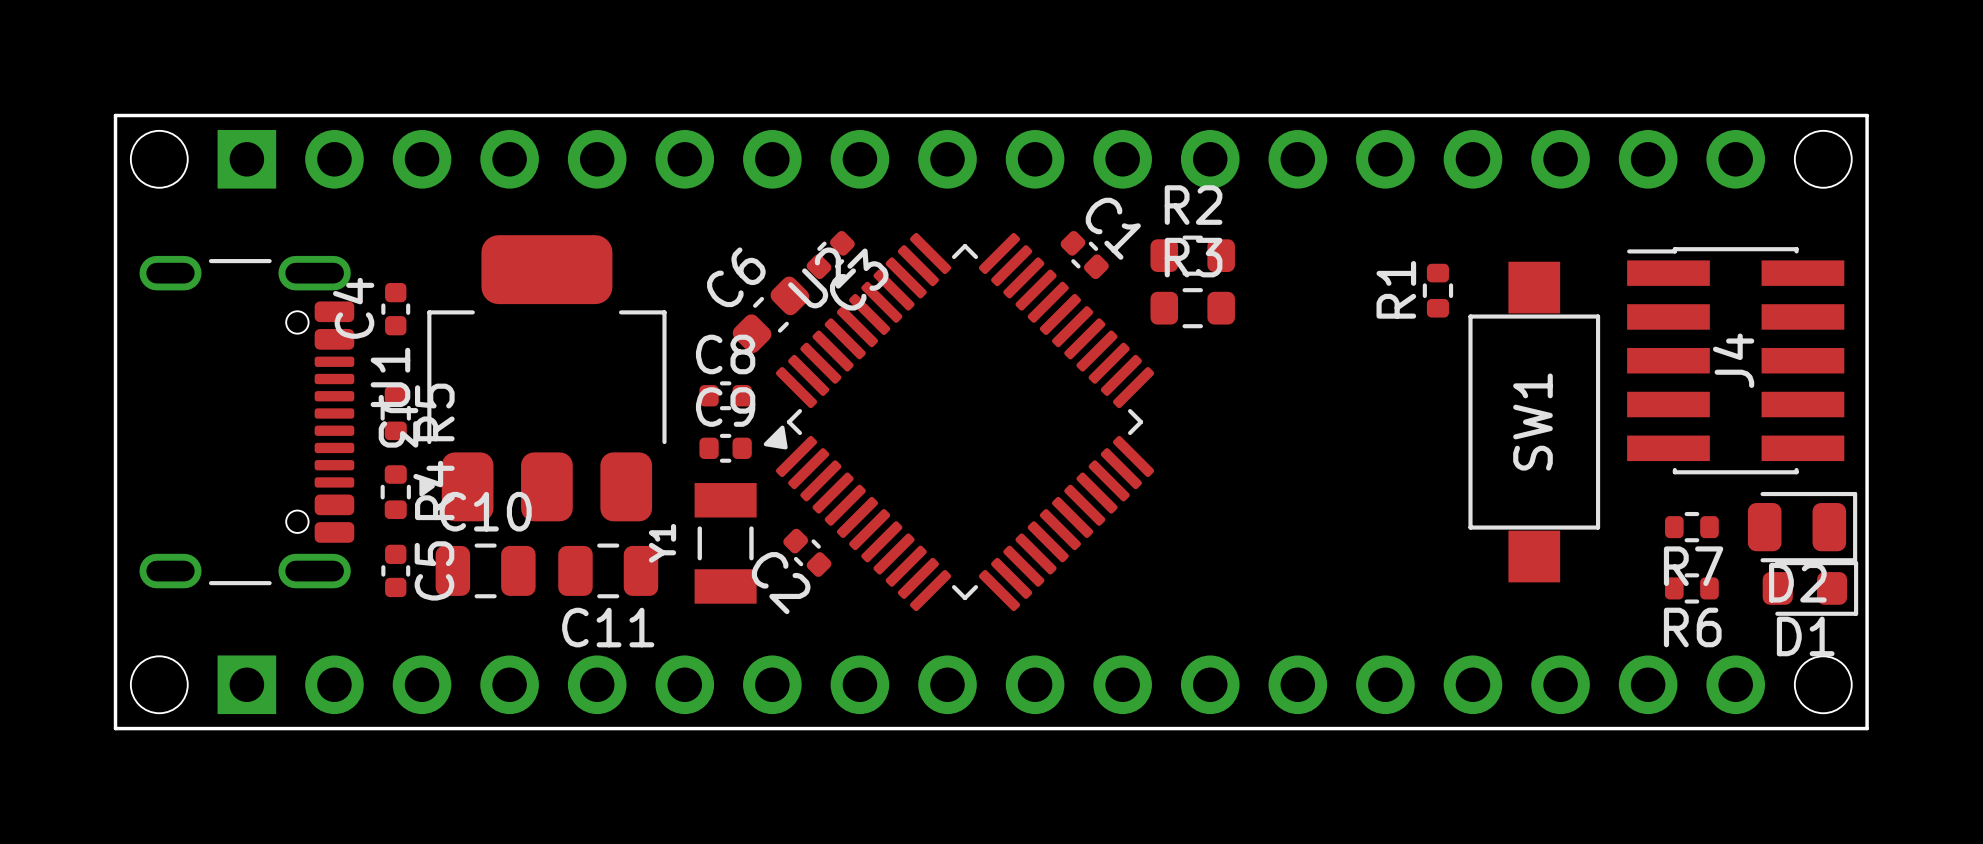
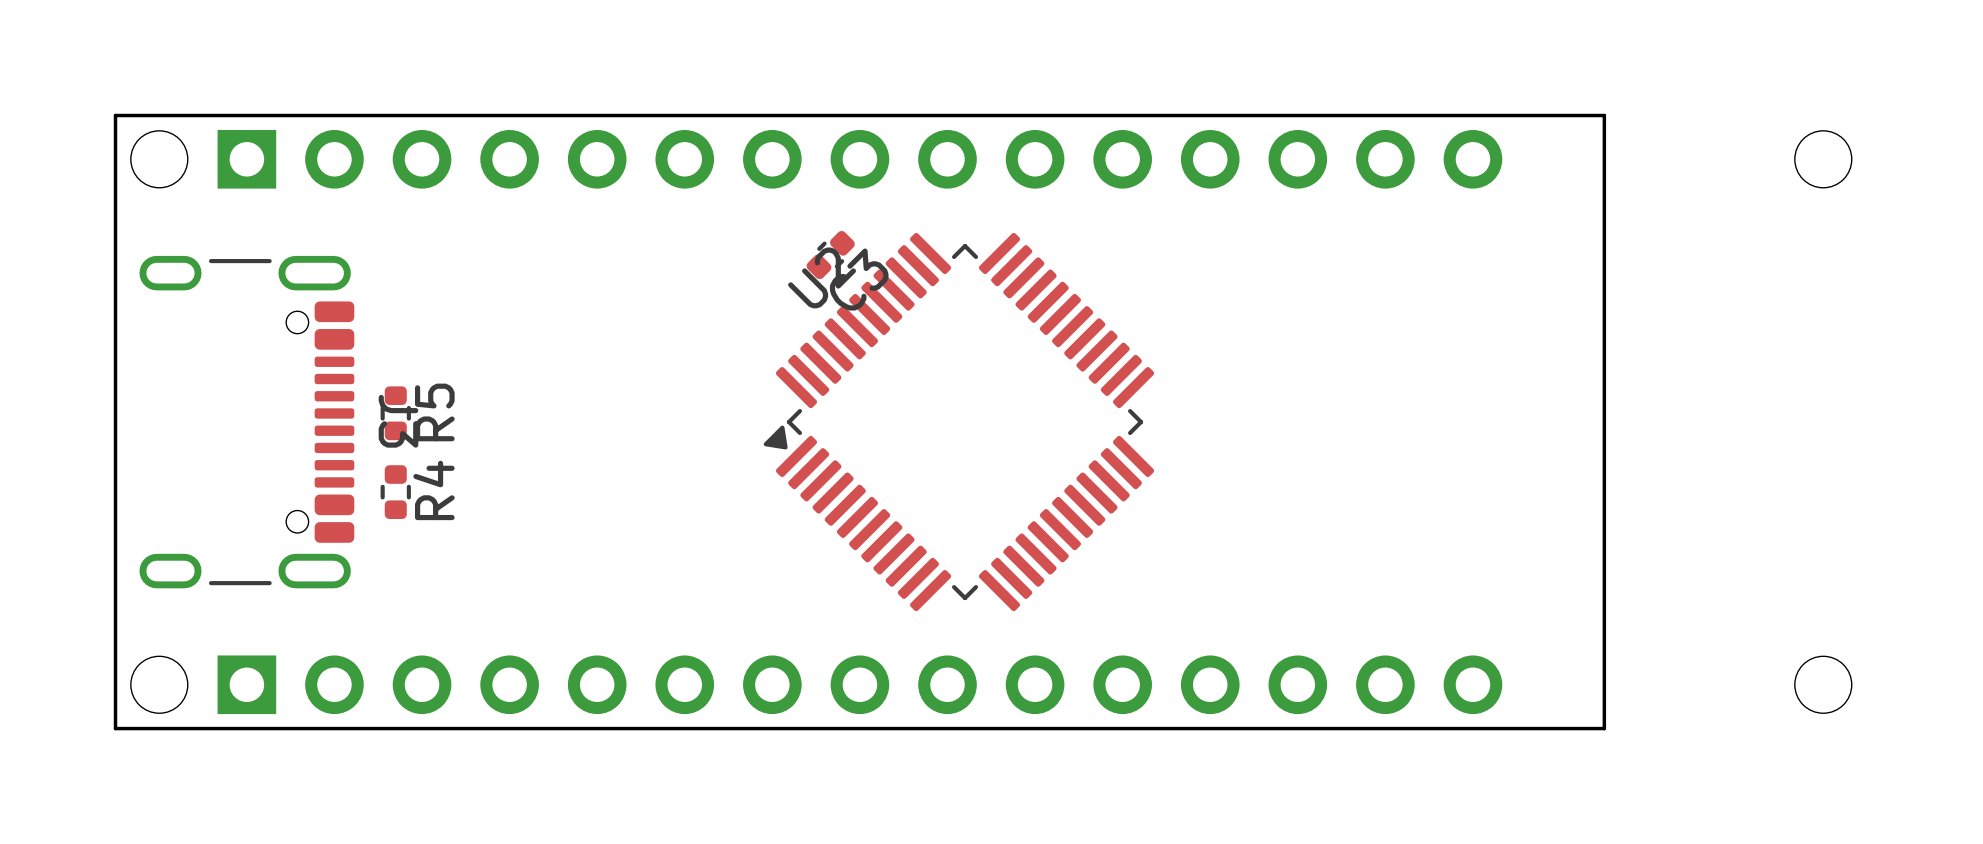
board edge: (1604, 115) (1867, 115) (1867, 728) (1604, 728) -> (1604, 115) (1604, 728)
part: none -> (859, 159)
part: (991, 159) -> none
C1: (1084, 255) -> none
R2: (1192, 255) -> none
R1: (1437, 290) -> none
R3: (1192, 308) -> none
C4: (395, 309) -> none
C6: (770, 314) -> none
J4: (1735, 360) -> none
U1: (542, 378) -> none
C8: (725, 395) -> none
SW1: (1534, 422) -> none
C9: (725, 448) -> none
R7: (1691, 527) -> none
D2: (1802, 527) -> none
Y1: (725, 543) -> none
C2: (807, 552) -> none
C5: (395, 570) -> none
C10: (485, 570) -> none
C11: (608, 570) -> none
R6: (1691, 588) -> none
D1: (1810, 588) -> none
part: (991, 684) -> none

